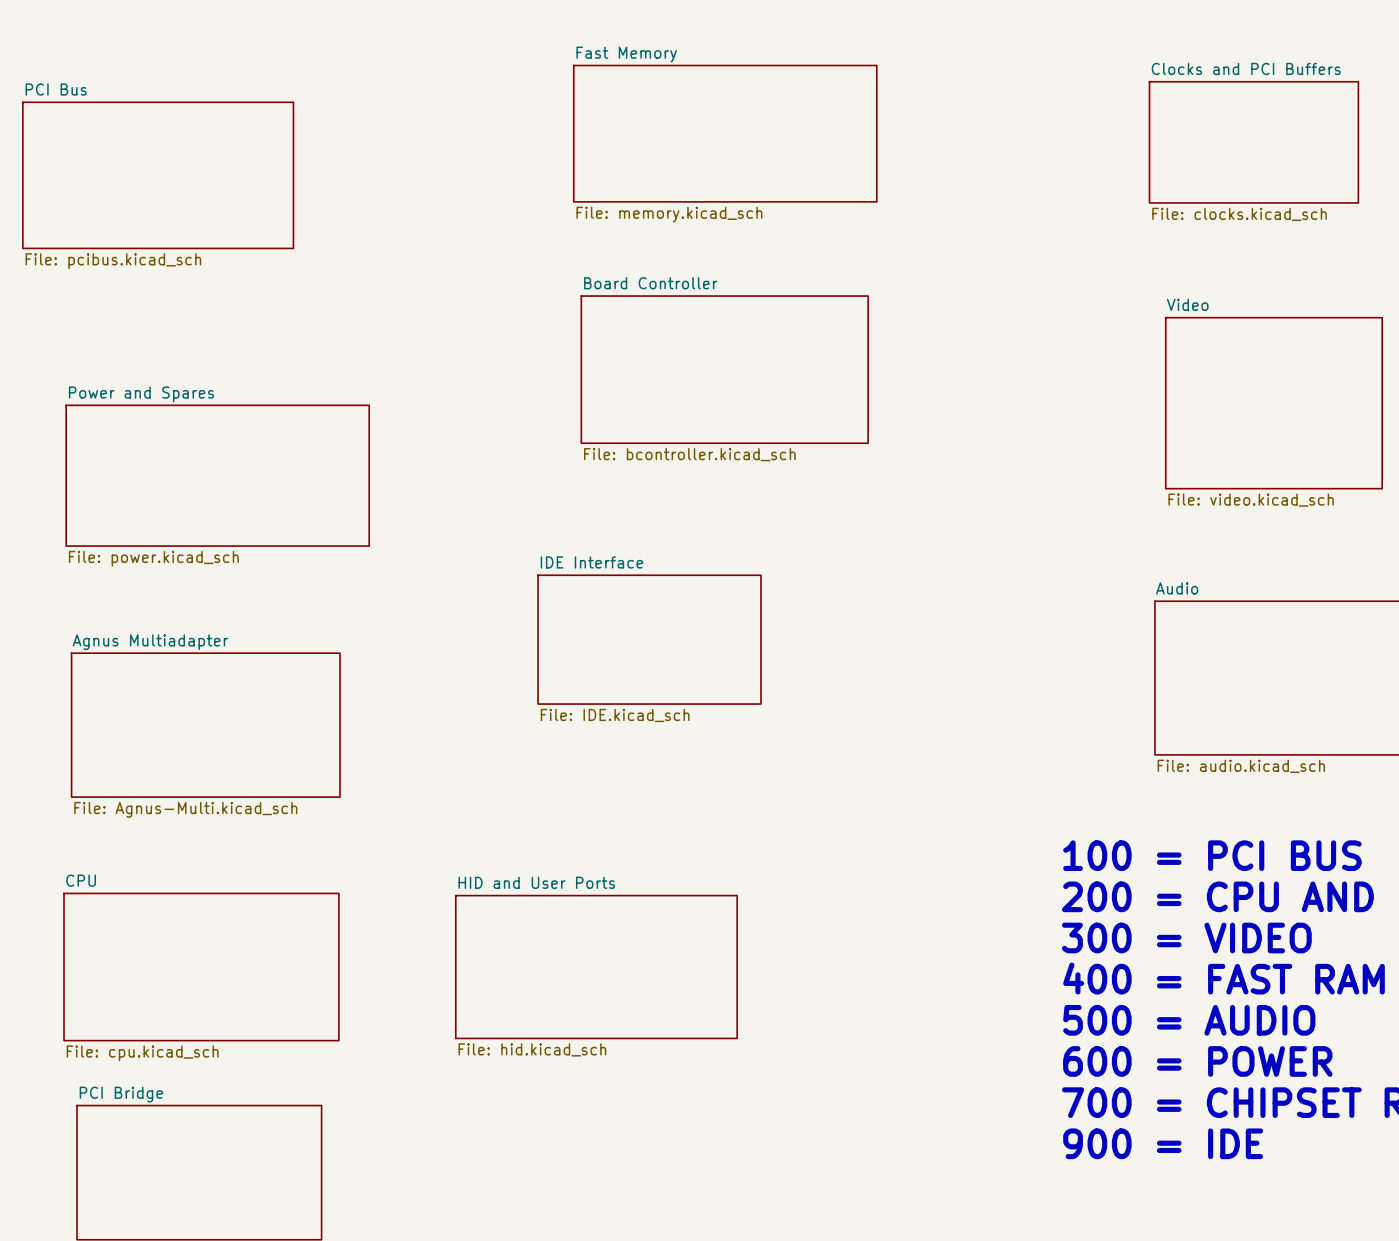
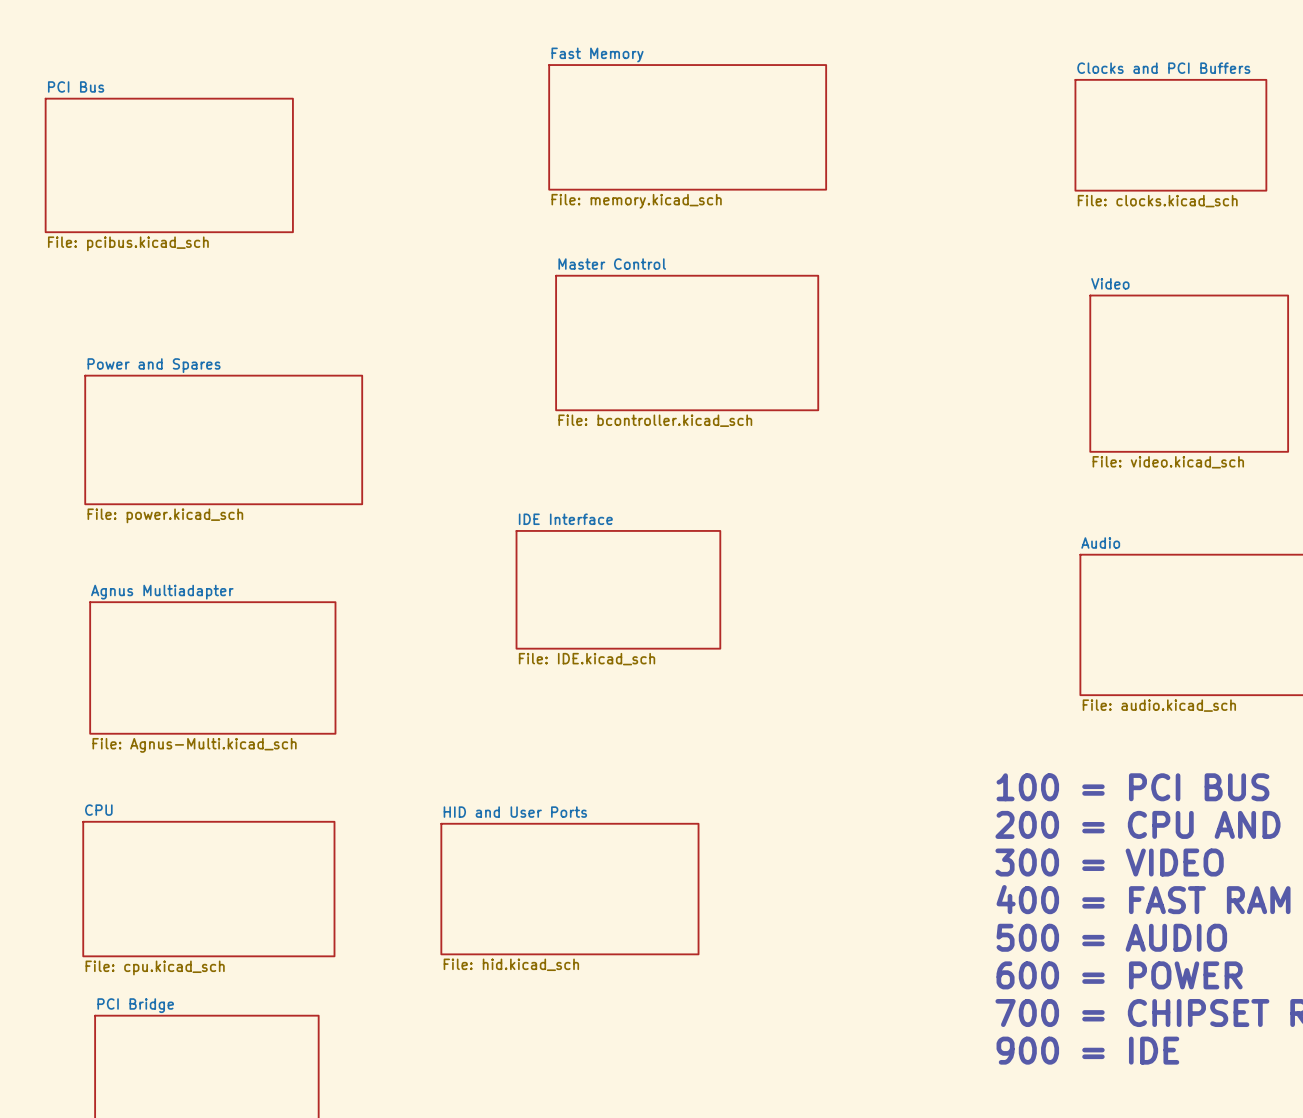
sheet Board Controller name: Board Controller (650, 283) -> Master Control (612, 264)

